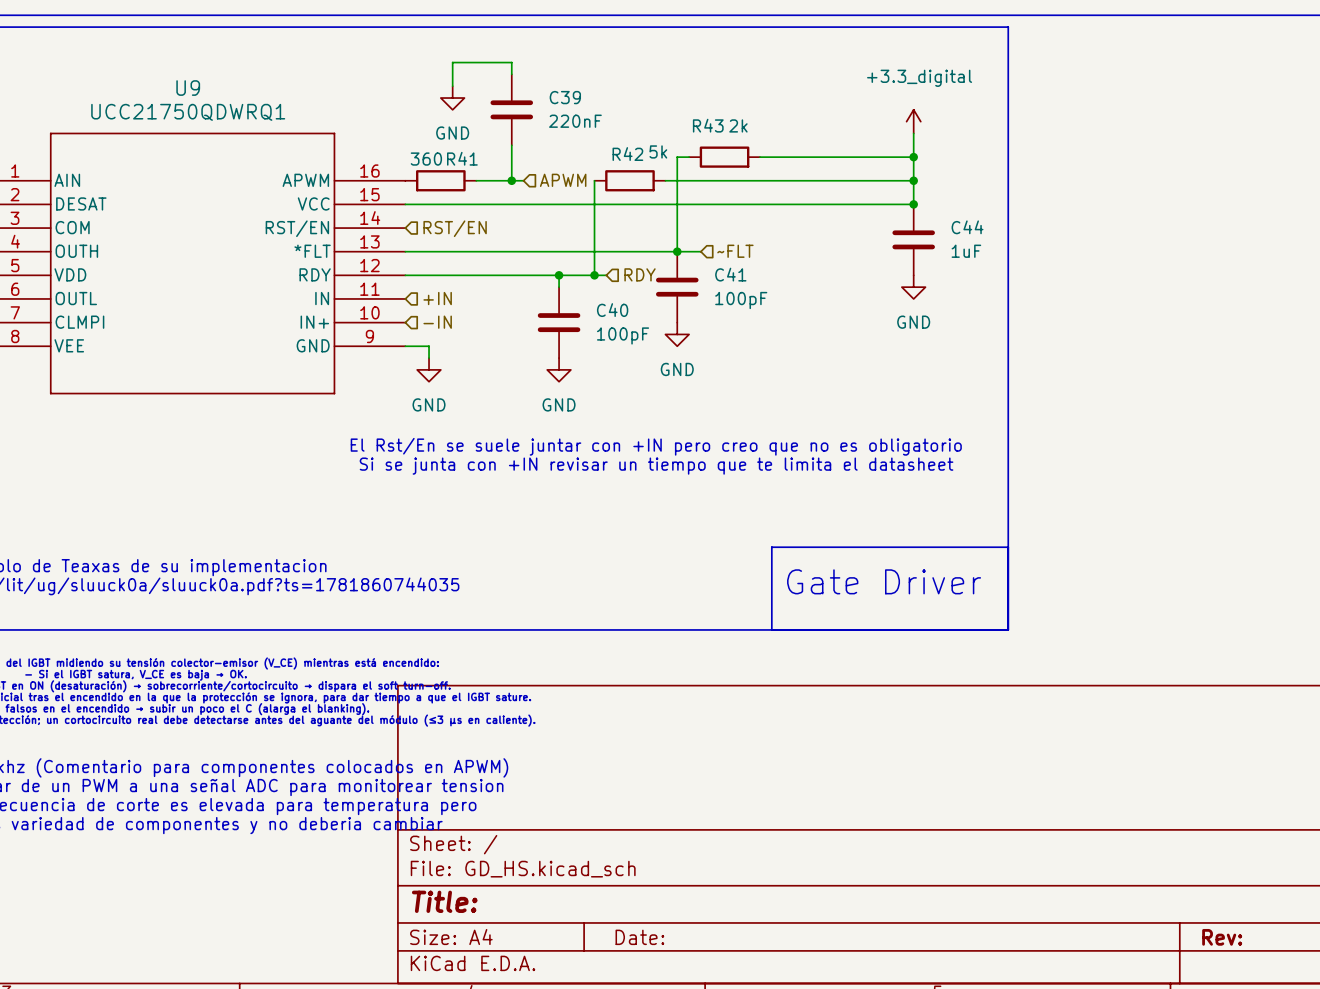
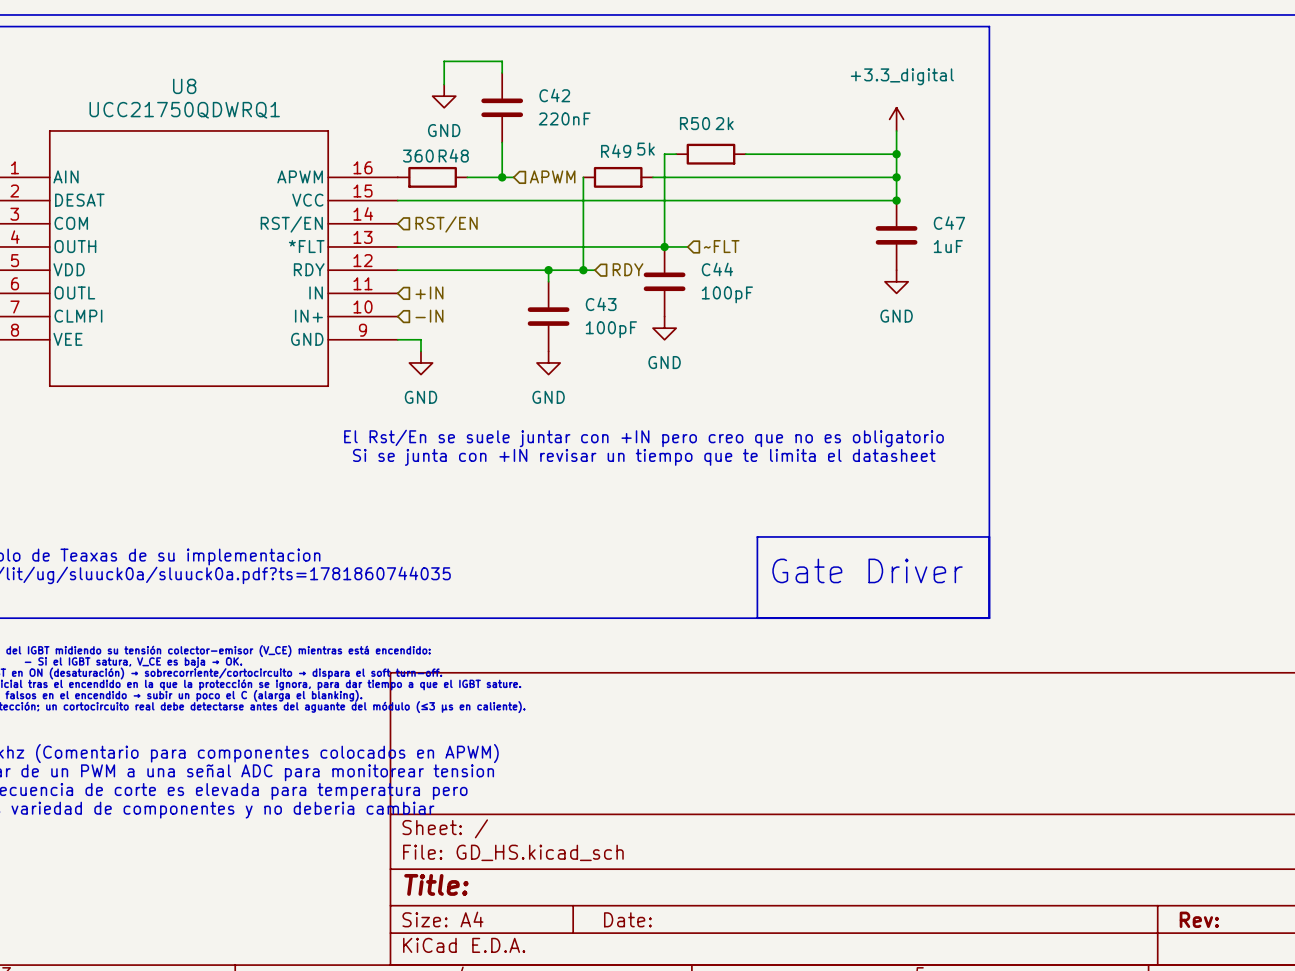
U9 name: U9 (188, 88) -> U8 (184, 86)
C39 name: C39 (565, 97) -> C42 (554, 95)
R43 name: R43 (708, 125) -> R50 (695, 123)
R42 name: R42 (627, 154) -> R49 (616, 151)
R41 name: R41 (462, 158) -> R48 (453, 155)
C44 name: C44 (967, 227) -> C47 (949, 223)
C41 name: C41 (730, 274) -> C44 (717, 269)
C40 name: C40 (612, 310) -> C43 (601, 304)

